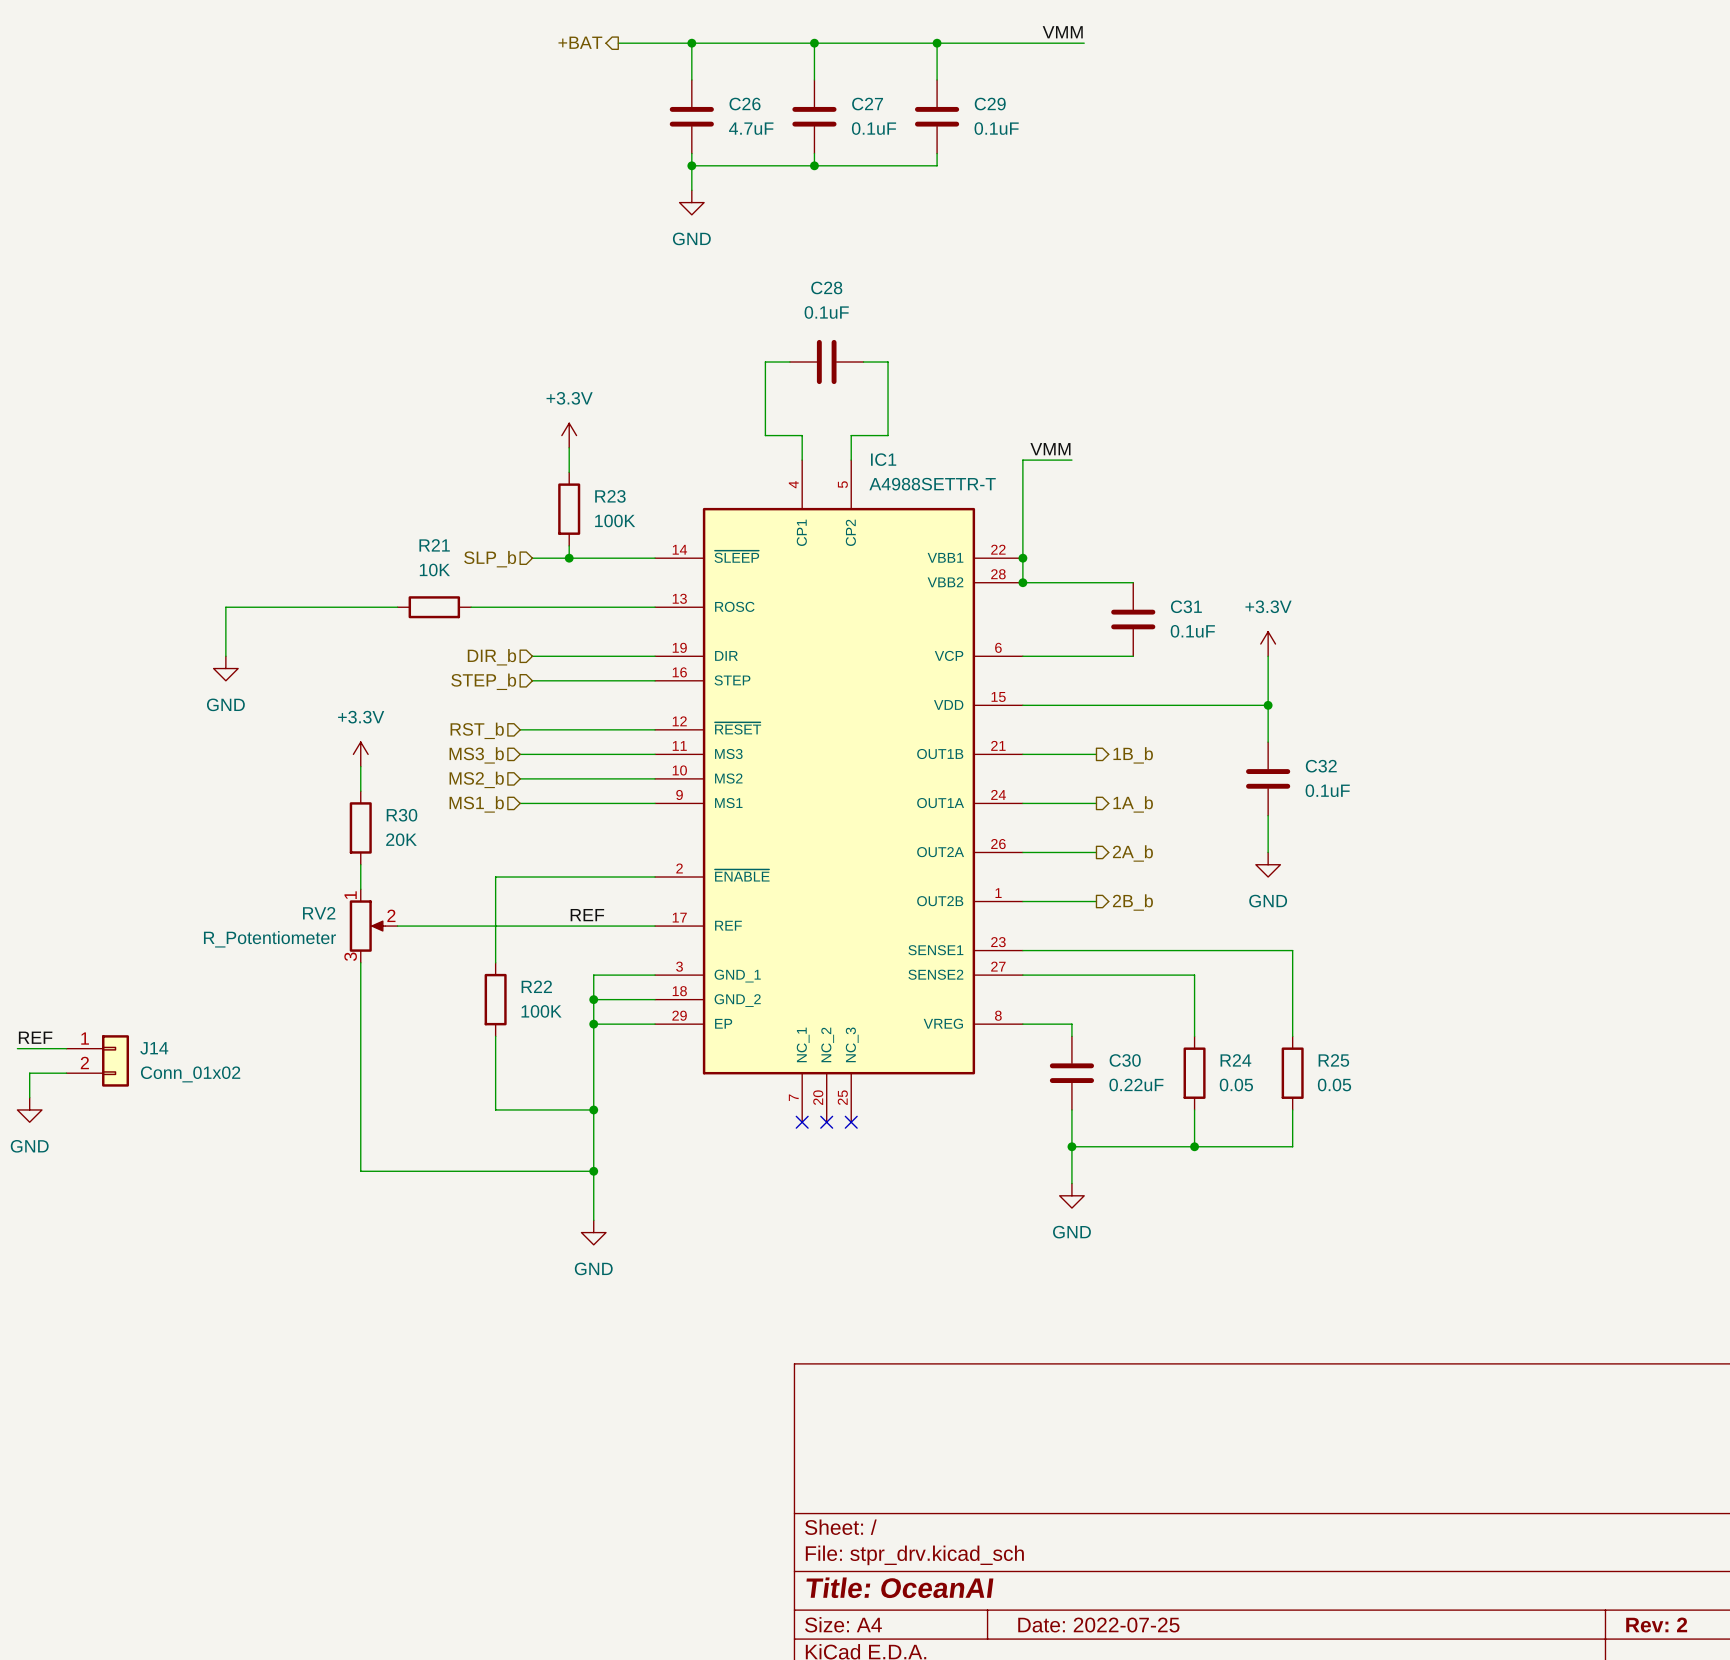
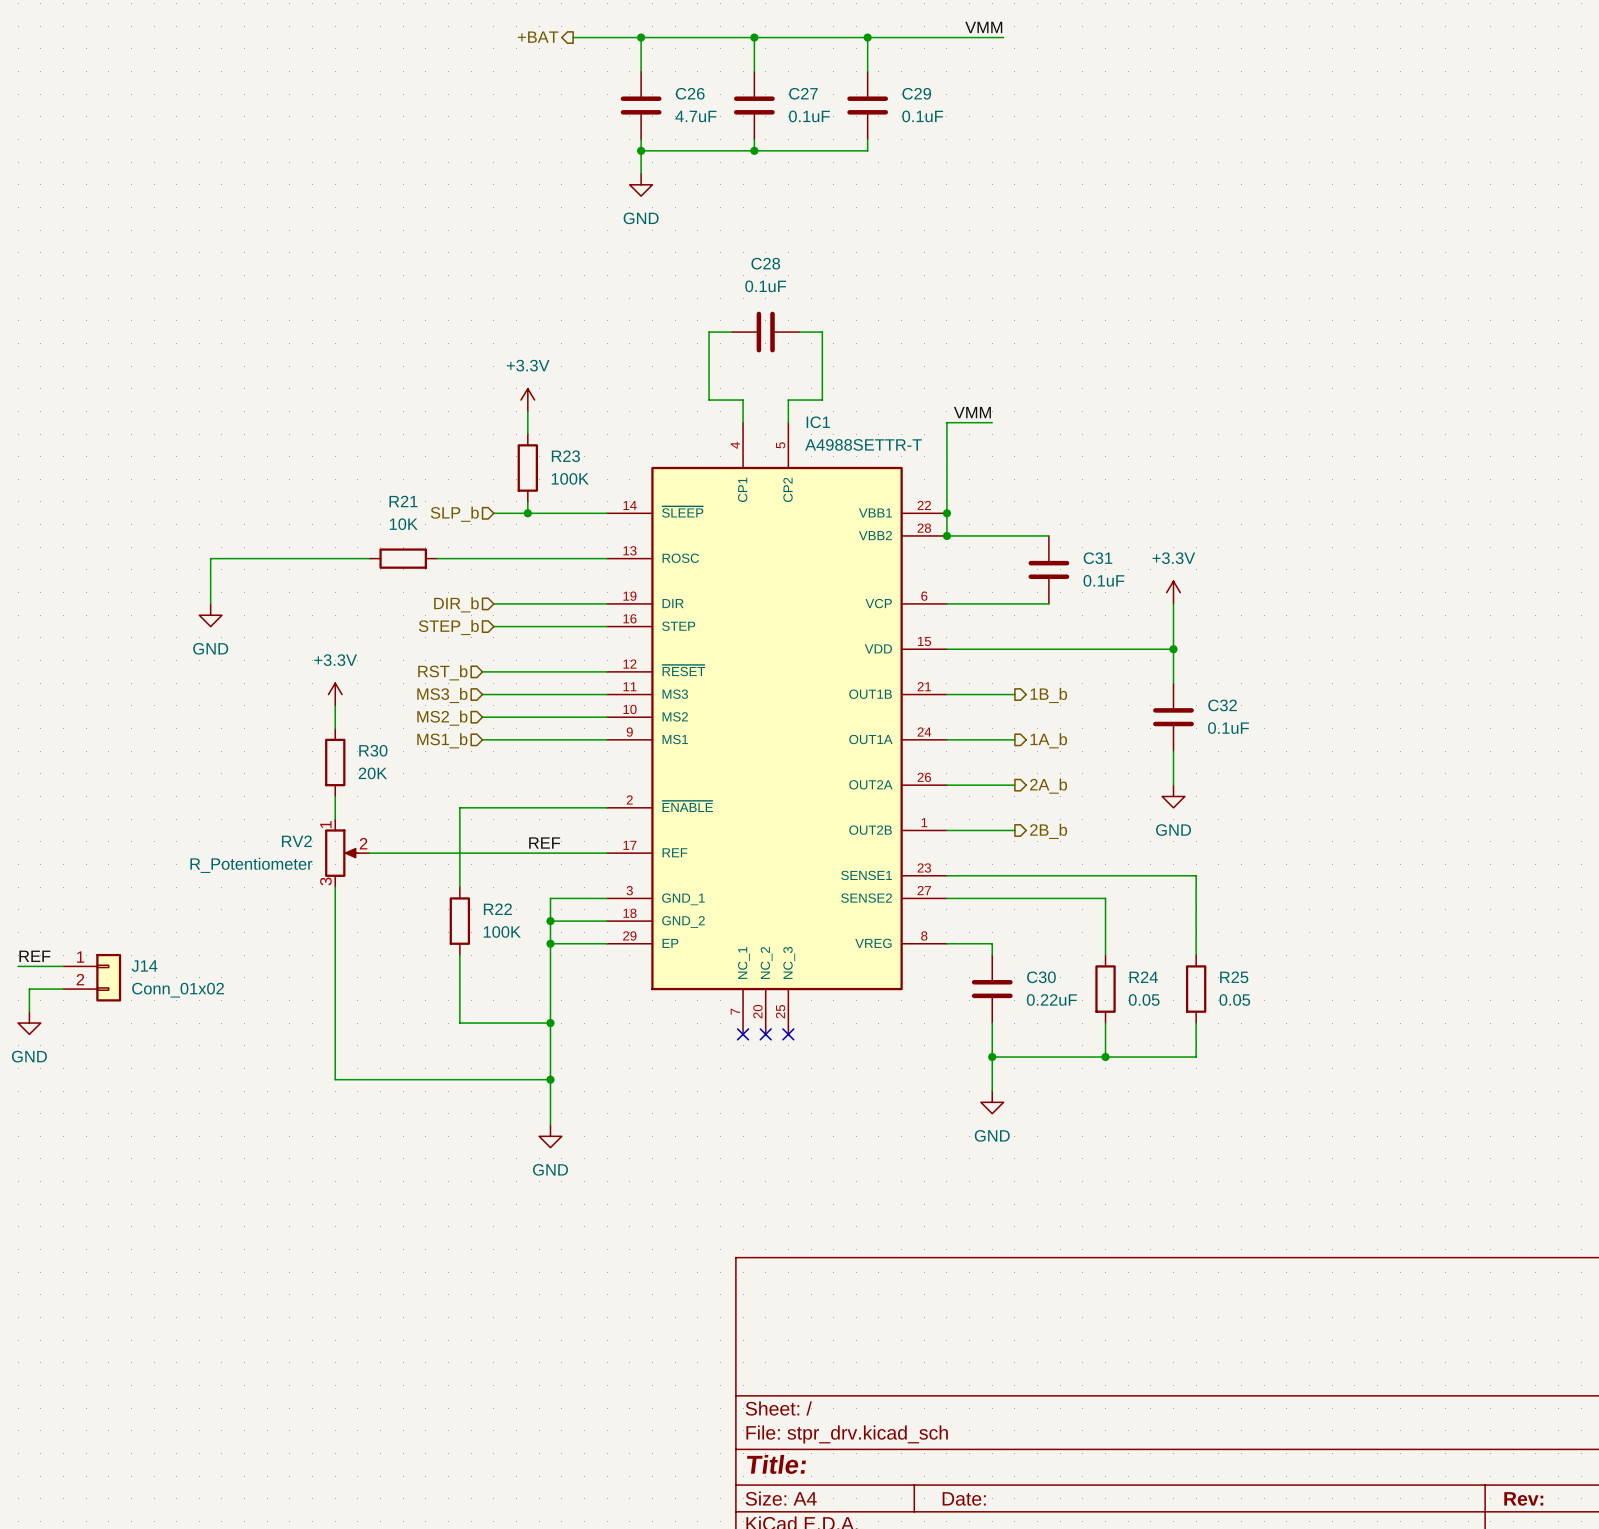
title block: Title: OceanAI (899, 1587) -> Title: (776, 1464)
title block: Date: 2022-07-25 (1098, 1625) -> Date: (964, 1498)
title block: Rev: 2 (1656, 1625) -> Rev: (1523, 1498)

